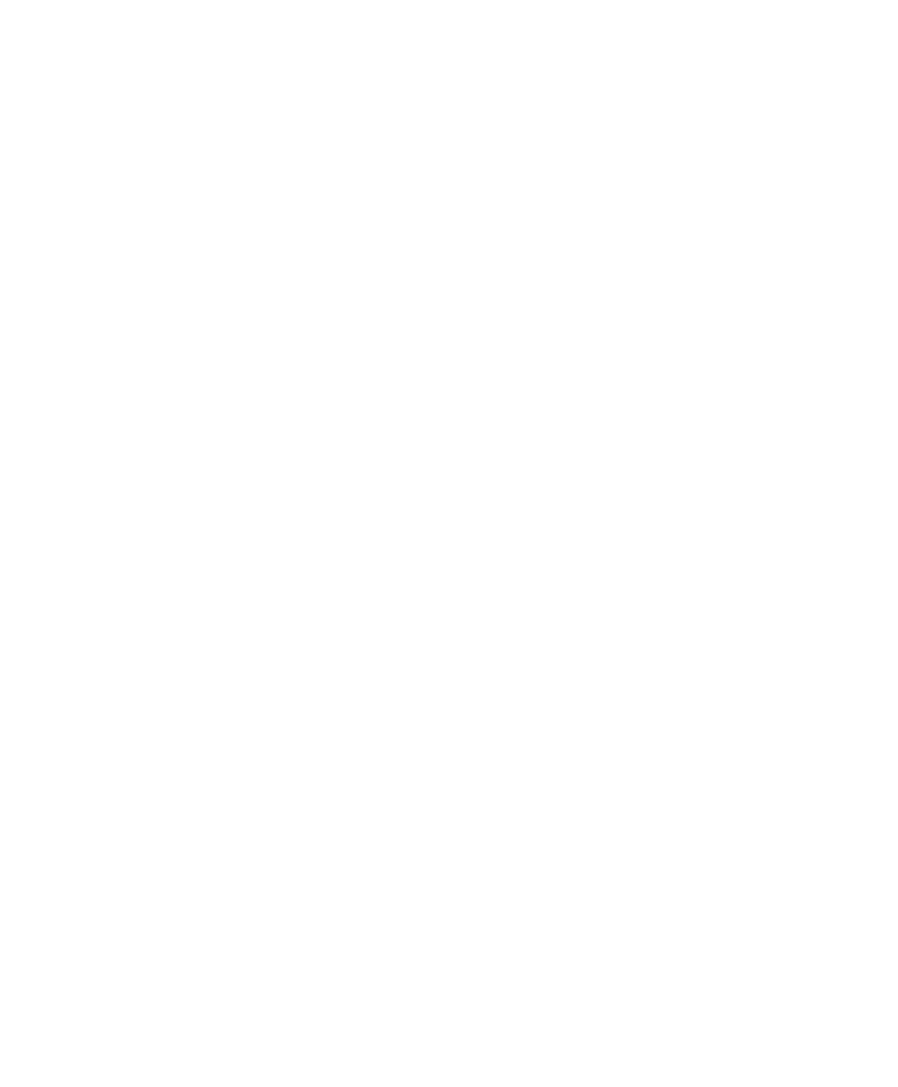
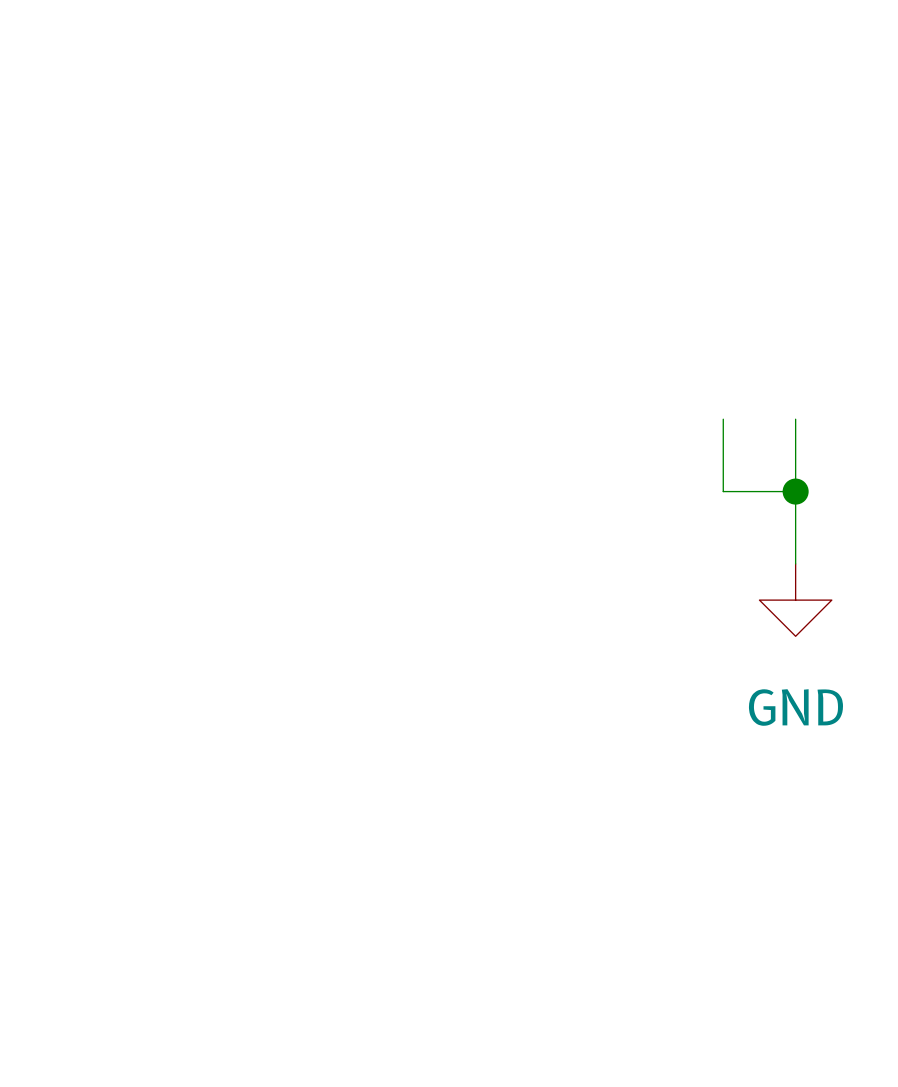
wire: none -> (723, 419) (723, 491) (795, 491)
wire: none -> (795, 419) (795, 563)
junction: none -> (795, 491)
power symbol: none -> GND (795, 600)

